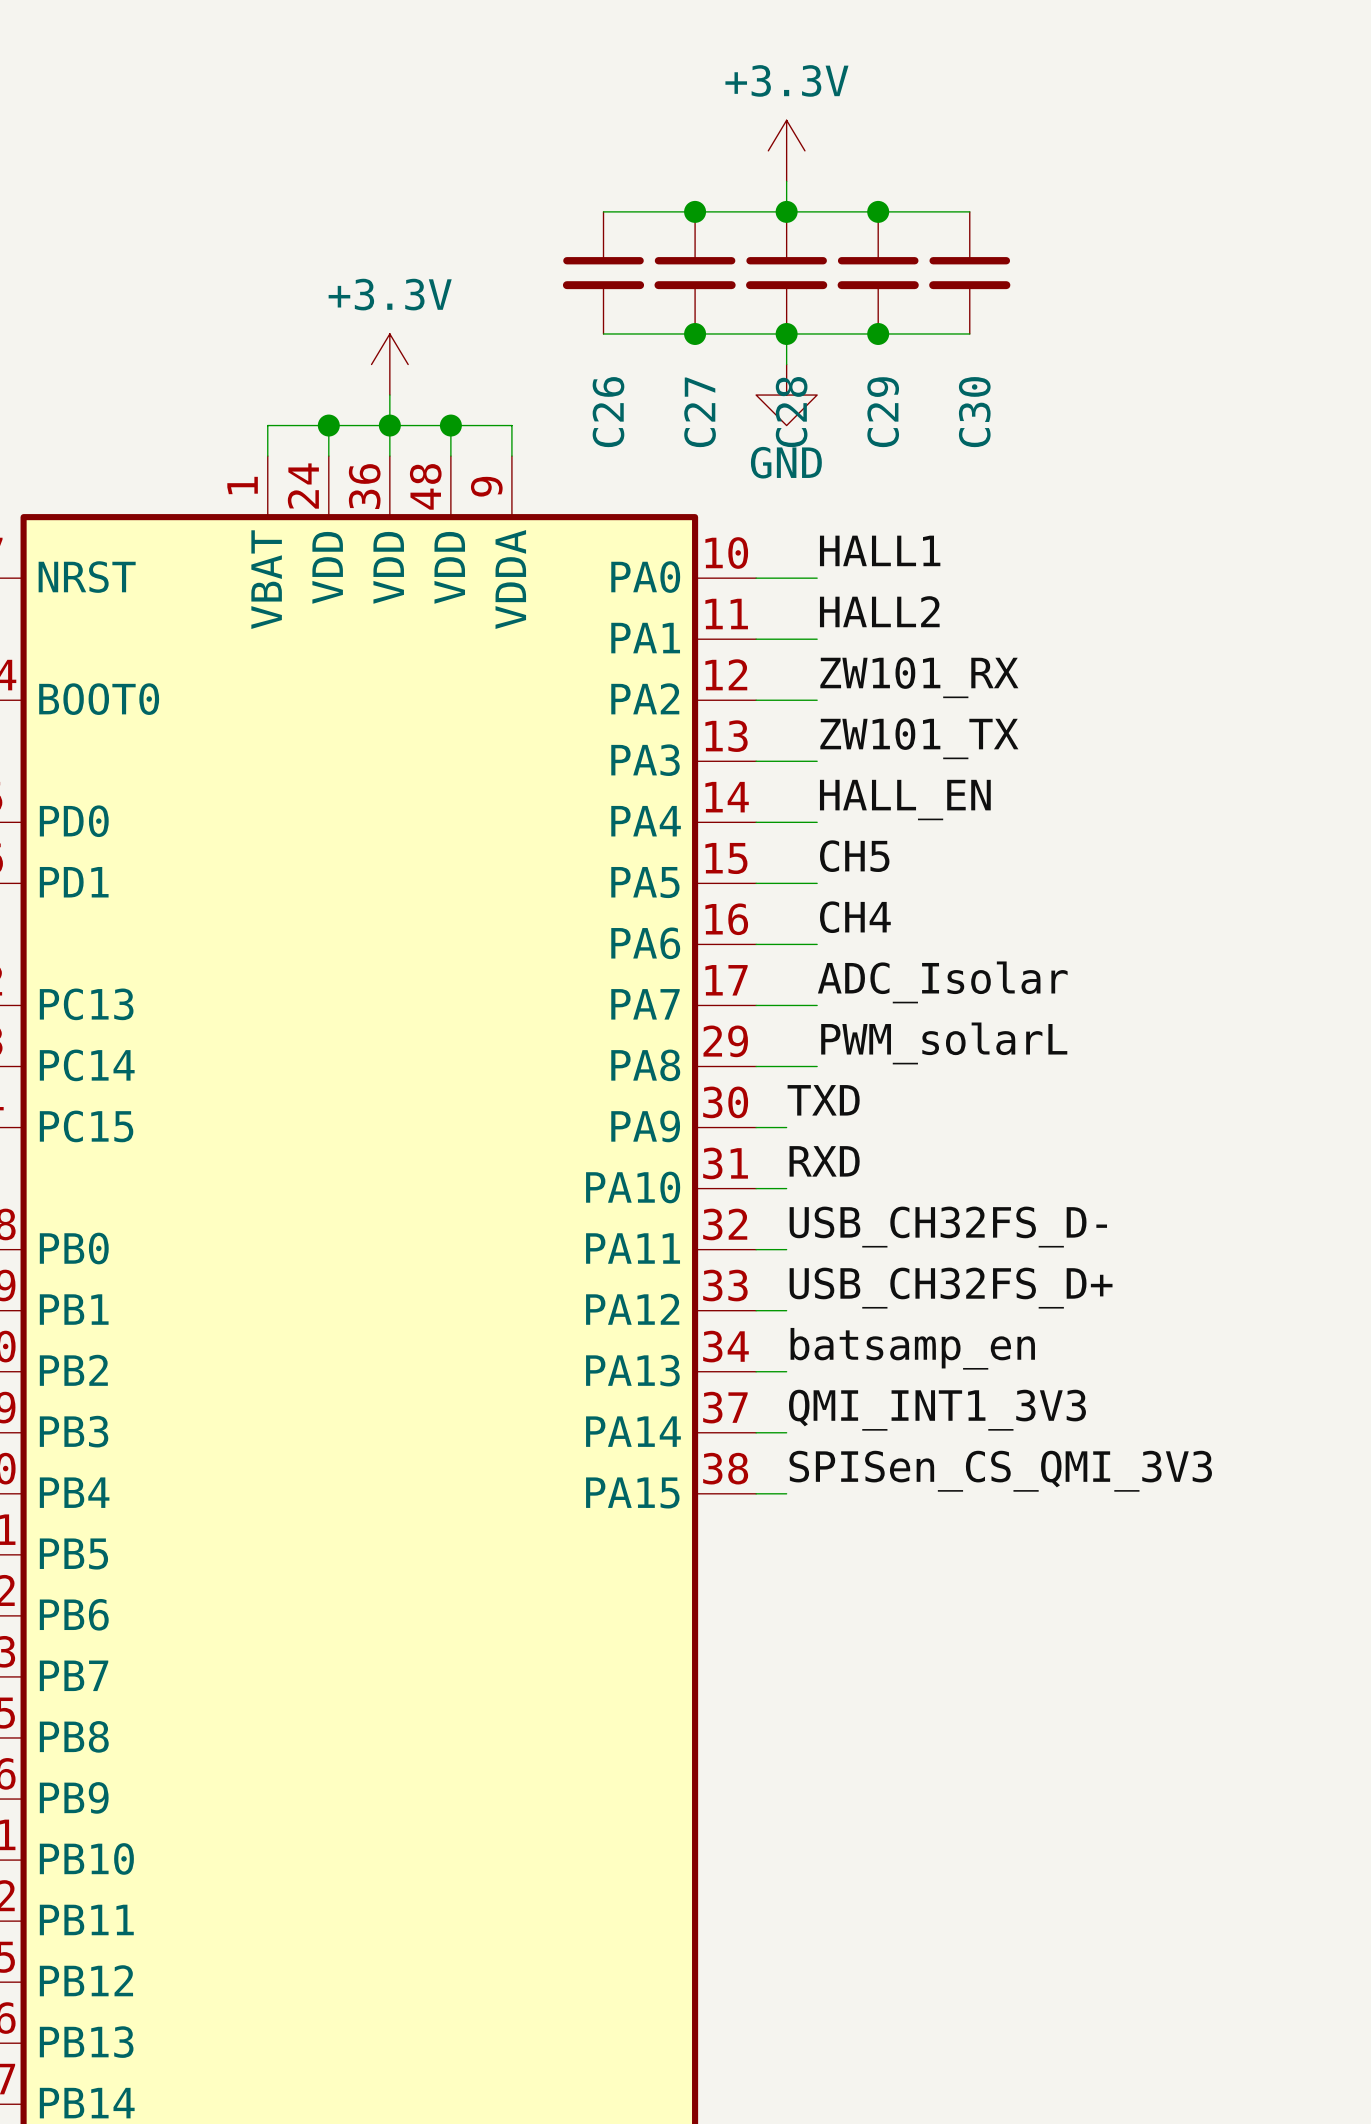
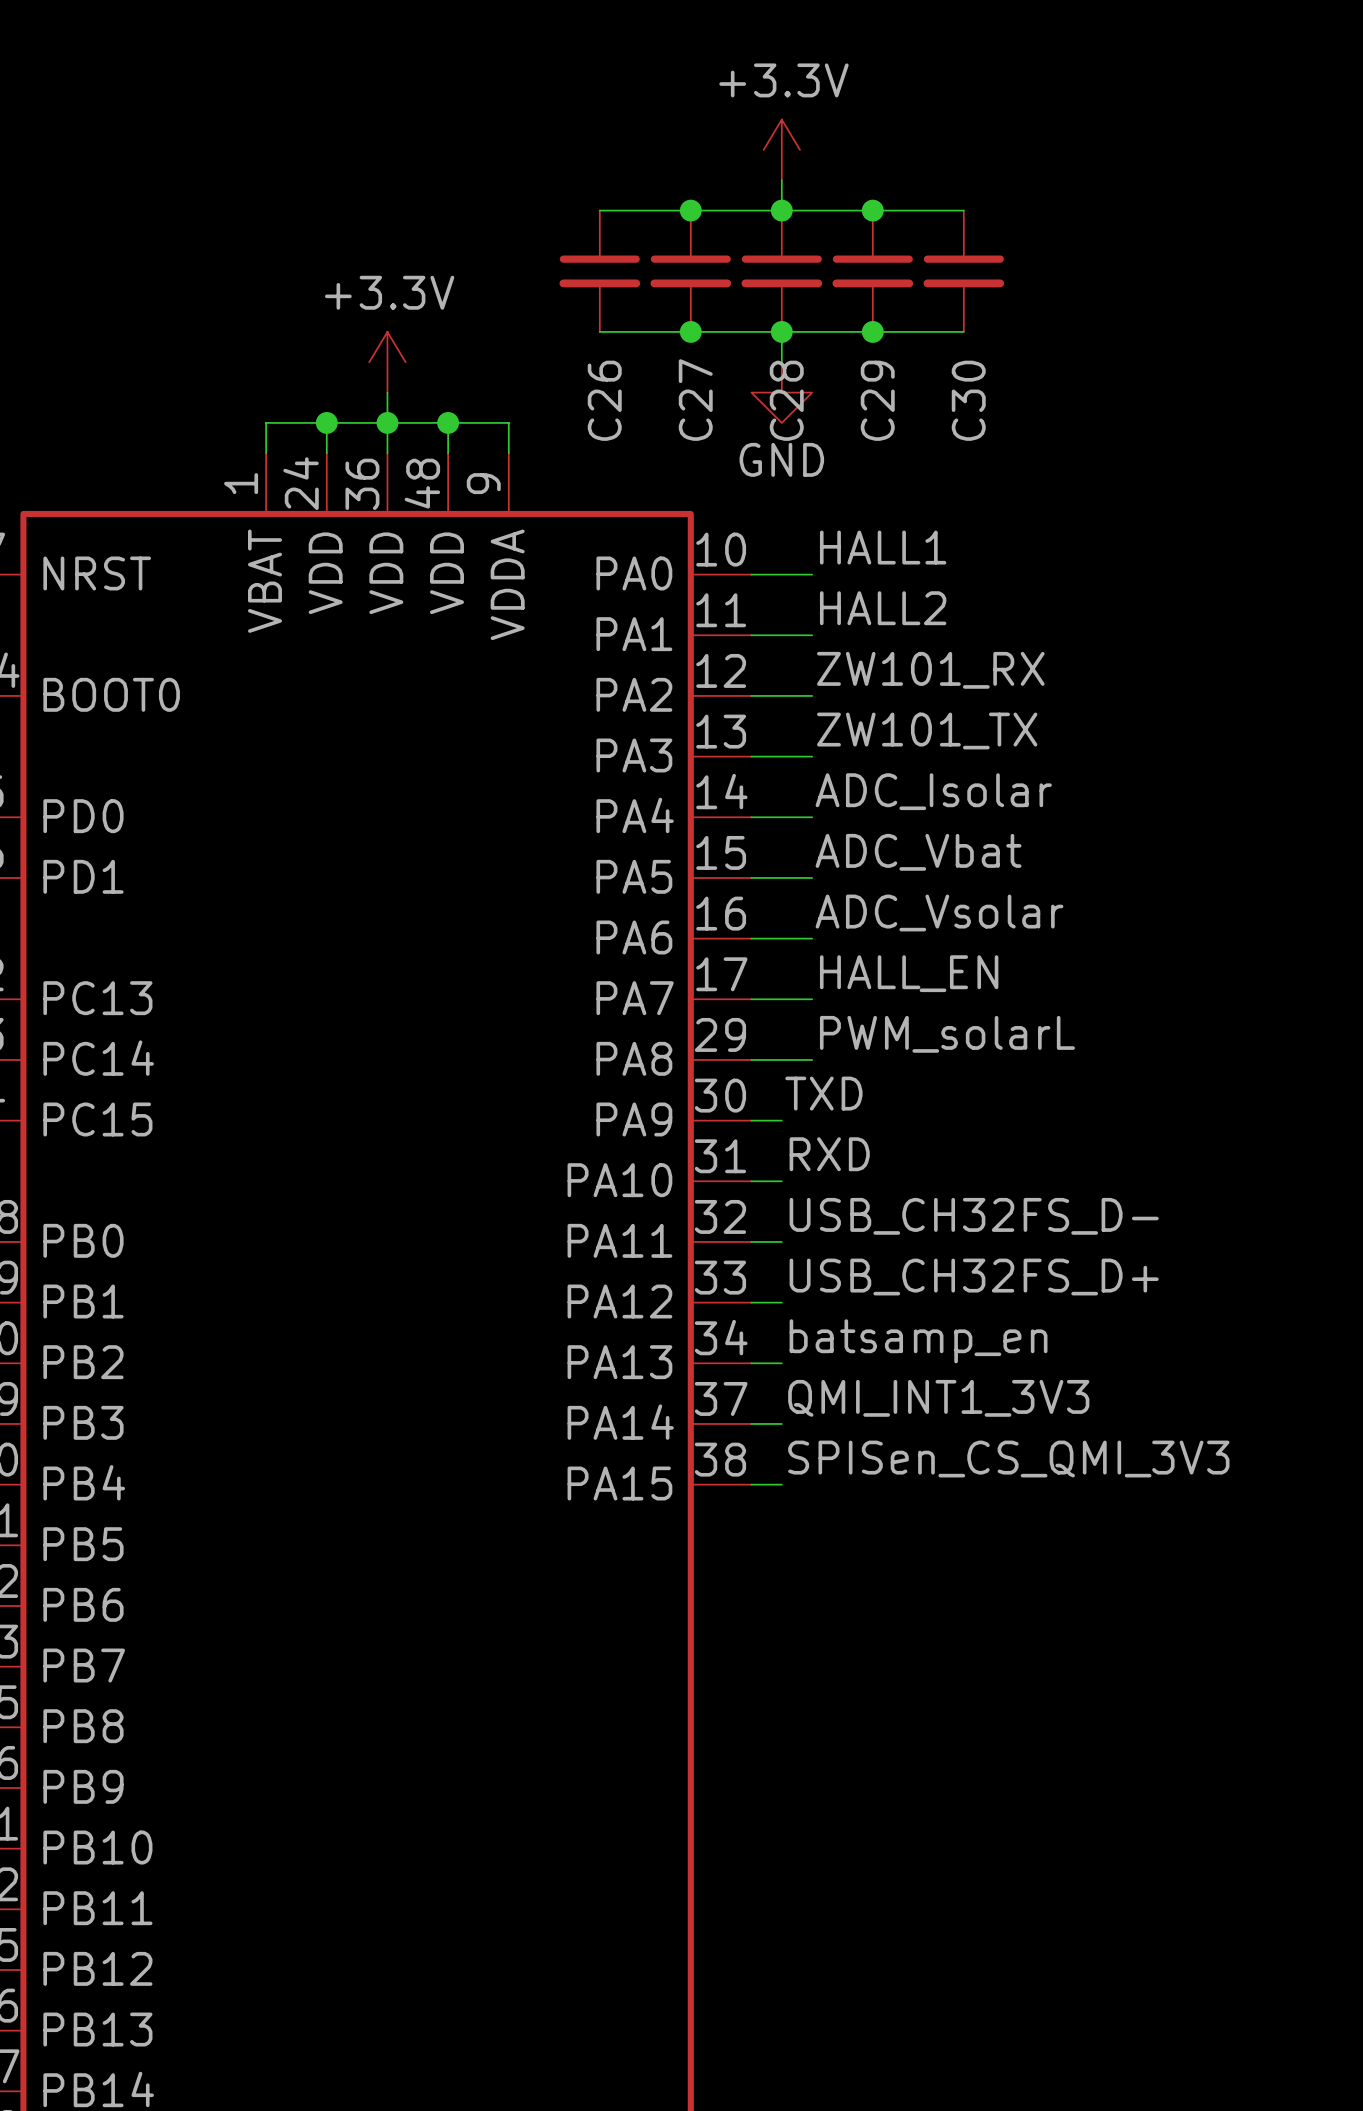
label: HALL_EN (905, 800) -> ADC_Isolar (933, 791)
label: CH5 (854, 856) -> ADC_Vbat (918, 852)
label: CH4 (855, 917) -> ADC_Vsolar (939, 913)
label: ADC_Isolar (942, 982) -> HALL_EN (909, 973)

